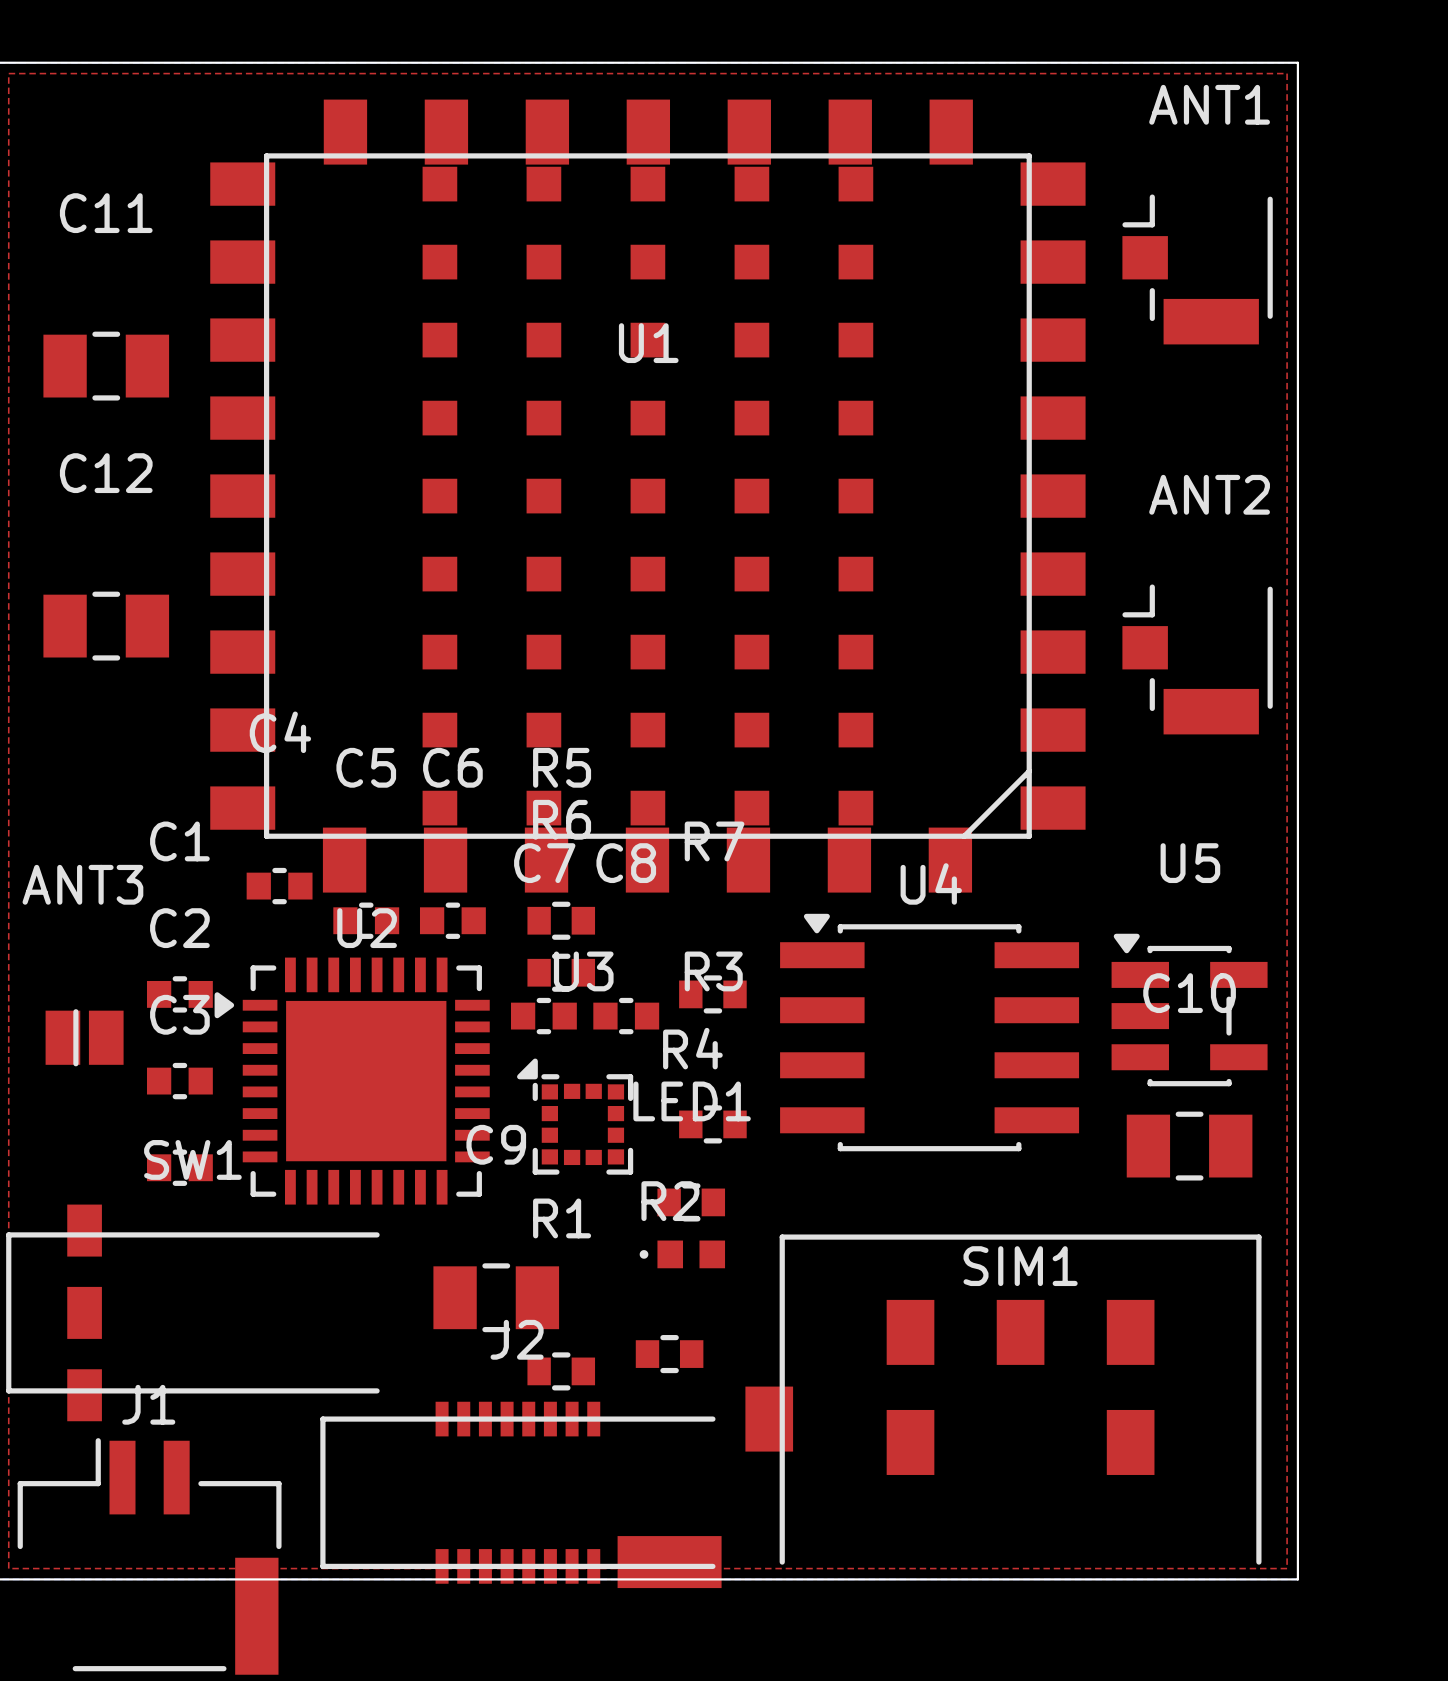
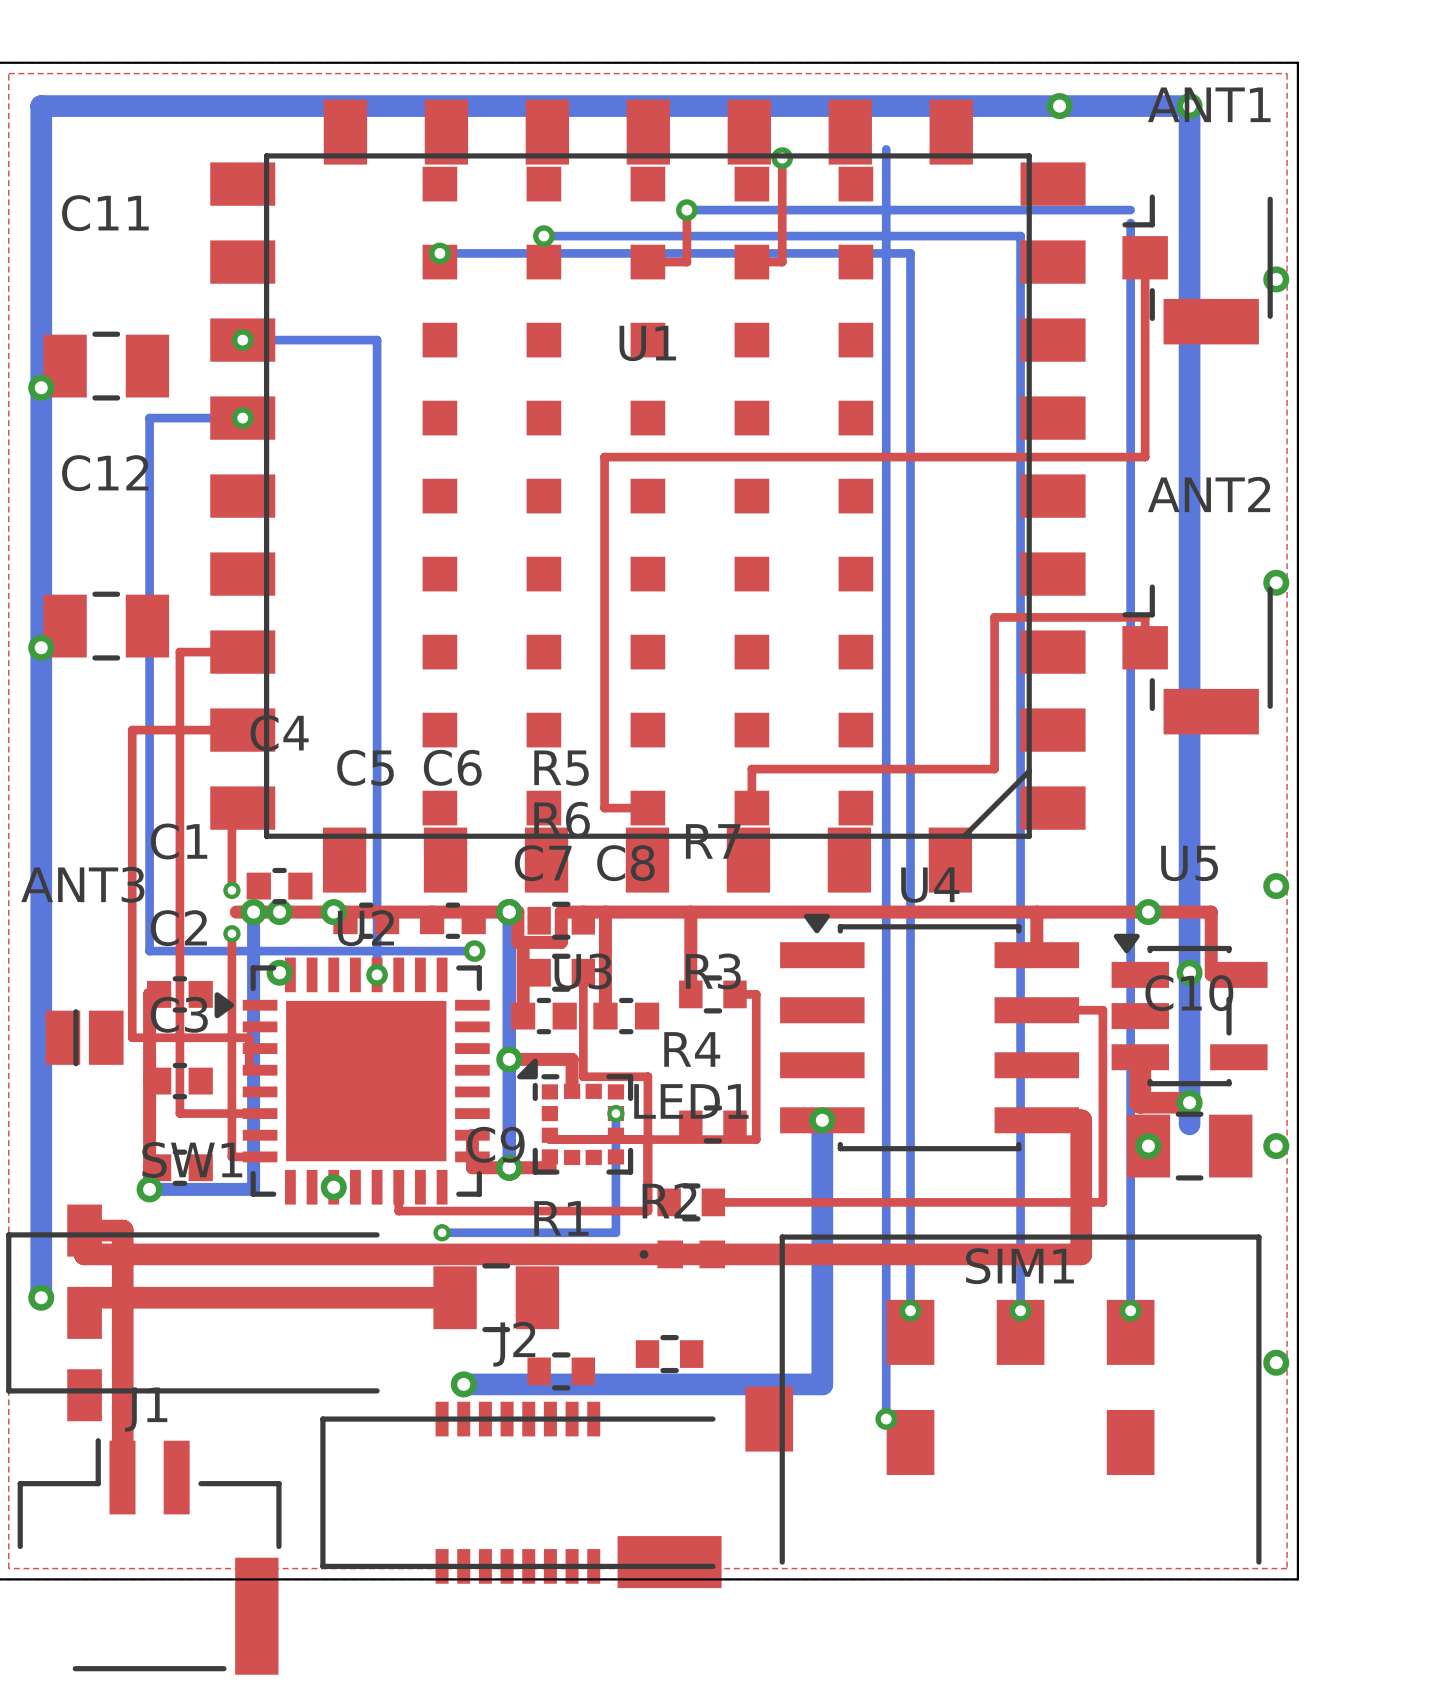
via: none -> (1059, 106)
via: none -> (1189, 106)
bottom track: none -> (886, 149) (886, 1419)
top track: none -> (782, 158) (782, 262) (751, 262)
via: none -> (782, 158)
top track: none -> (686, 210) (686, 262) (647, 262)
bottom track: none -> (686, 210) (1130, 210)
via: none -> (686, 210)
bottom track: none -> (1130, 223) (1130, 1310)
bottom track: none -> (543, 236) (1020, 236) (1020, 1310)
via: none -> (543, 236)
bottom track: none -> (439, 253) (910, 253) (910, 1310)
via: none -> (439, 253)
top track: none -> (1145, 257) (1145, 457) (604, 457) (604, 808) (647, 808)
via: none -> (1276, 279)
bottom track: none -> (242, 340) (377, 340) (377, 974)
via: none -> (242, 340)
via: none -> (41, 387)
bottom track: none -> (242, 418) (149, 418) (149, 951) (474, 951)
via: none -> (242, 418)
via: none -> (1276, 582)
via: none -> (41, 647)
top track: none -> (1145, 647) (1145, 617) (994, 617) (994, 769) (751, 769) (751, 808)
top track: none -> (242, 652) (179, 652) (179, 1113) (260, 1113)
top track: none -> (242, 730) (132, 730) (132, 1037) (249, 1037) (249, 1070) (260, 1070)
top track: none -> (242, 808) (231, 808) (231, 890)
via: none -> (1276, 886)
via: none -> (231, 890)
top track: none -> (236, 912) (517, 912) (517, 942) (561, 942) (561, 912) (1211, 912) (1211, 974) (1238, 974)
bottom track: none -> (253, 912) (253, 1189) (149, 1189)
via: none -> (253, 912)
via: none -> (279, 912)
via: none -> (333, 912)
bottom track: none -> (509, 912) (509, 1167)
via: none -> (509, 912)
top track: none -> (605, 912) (605, 1016)
top track: none -> (690, 912) (690, 994)
top track: none -> (1036, 912) (1036, 955)
via: none -> (1148, 912)
top track: none -> (231, 933) (231, 1156) (260, 1156)
via: none -> (231, 933)
top track: none -> (523, 942) (523, 1016)
via: none -> (474, 951)
via: none -> (279, 972)
top track: none -> (583, 972) (583, 1076) (647, 1076) (647, 1211) (398, 1211) (398, 1187)
via: none -> (1189, 972)
via: none -> (377, 974)
top track: none -> (159, 994) (149, 994) (149, 1189)
top track: none -> (735, 994) (756, 994) (756, 1139) (549, 1139) (549, 1135)
top track: none -> (1036, 1010) (1102, 1010) (1102, 1202) (713, 1202)
top track: none -> (1140, 1057) (1140, 1102) (1189, 1102)
top track: none -> (509, 1059) (572, 1059) (572, 1091)
via: none -> (509, 1059)
via: none -> (1189, 1102)
bottom track: none -> (615, 1113) (615, 1232) (442, 1232)
via: none -> (615, 1113)
bottom track: none -> (822, 1120) (822, 1384) (463, 1384)
via: none -> (822, 1120)
top track: none -> (1036, 1120) (1081, 1120) (1081, 1254) (84, 1254) (84, 1230) (122, 1230) (122, 1477)
bottom track: none -> (1189, 1124) (1189, 106) (41, 106) (41, 1297)
top track: none -> (472, 1135) (472, 1167) (549, 1167) (549, 1156)
via: none -> (1148, 1146)
via: none -> (1276, 1146)
via: none -> (509, 1167)
via: none -> (333, 1187)
via: none -> (149, 1189)
via: none -> (442, 1232)
via: none -> (41, 1297)
top track: none -> (455, 1297) (84, 1297) (84, 1312)
via: none -> (910, 1310)
via: none -> (1020, 1310)
via: none -> (1130, 1310)
via: none -> (1276, 1362)
via: none -> (463, 1384)
via: none -> (886, 1419)

